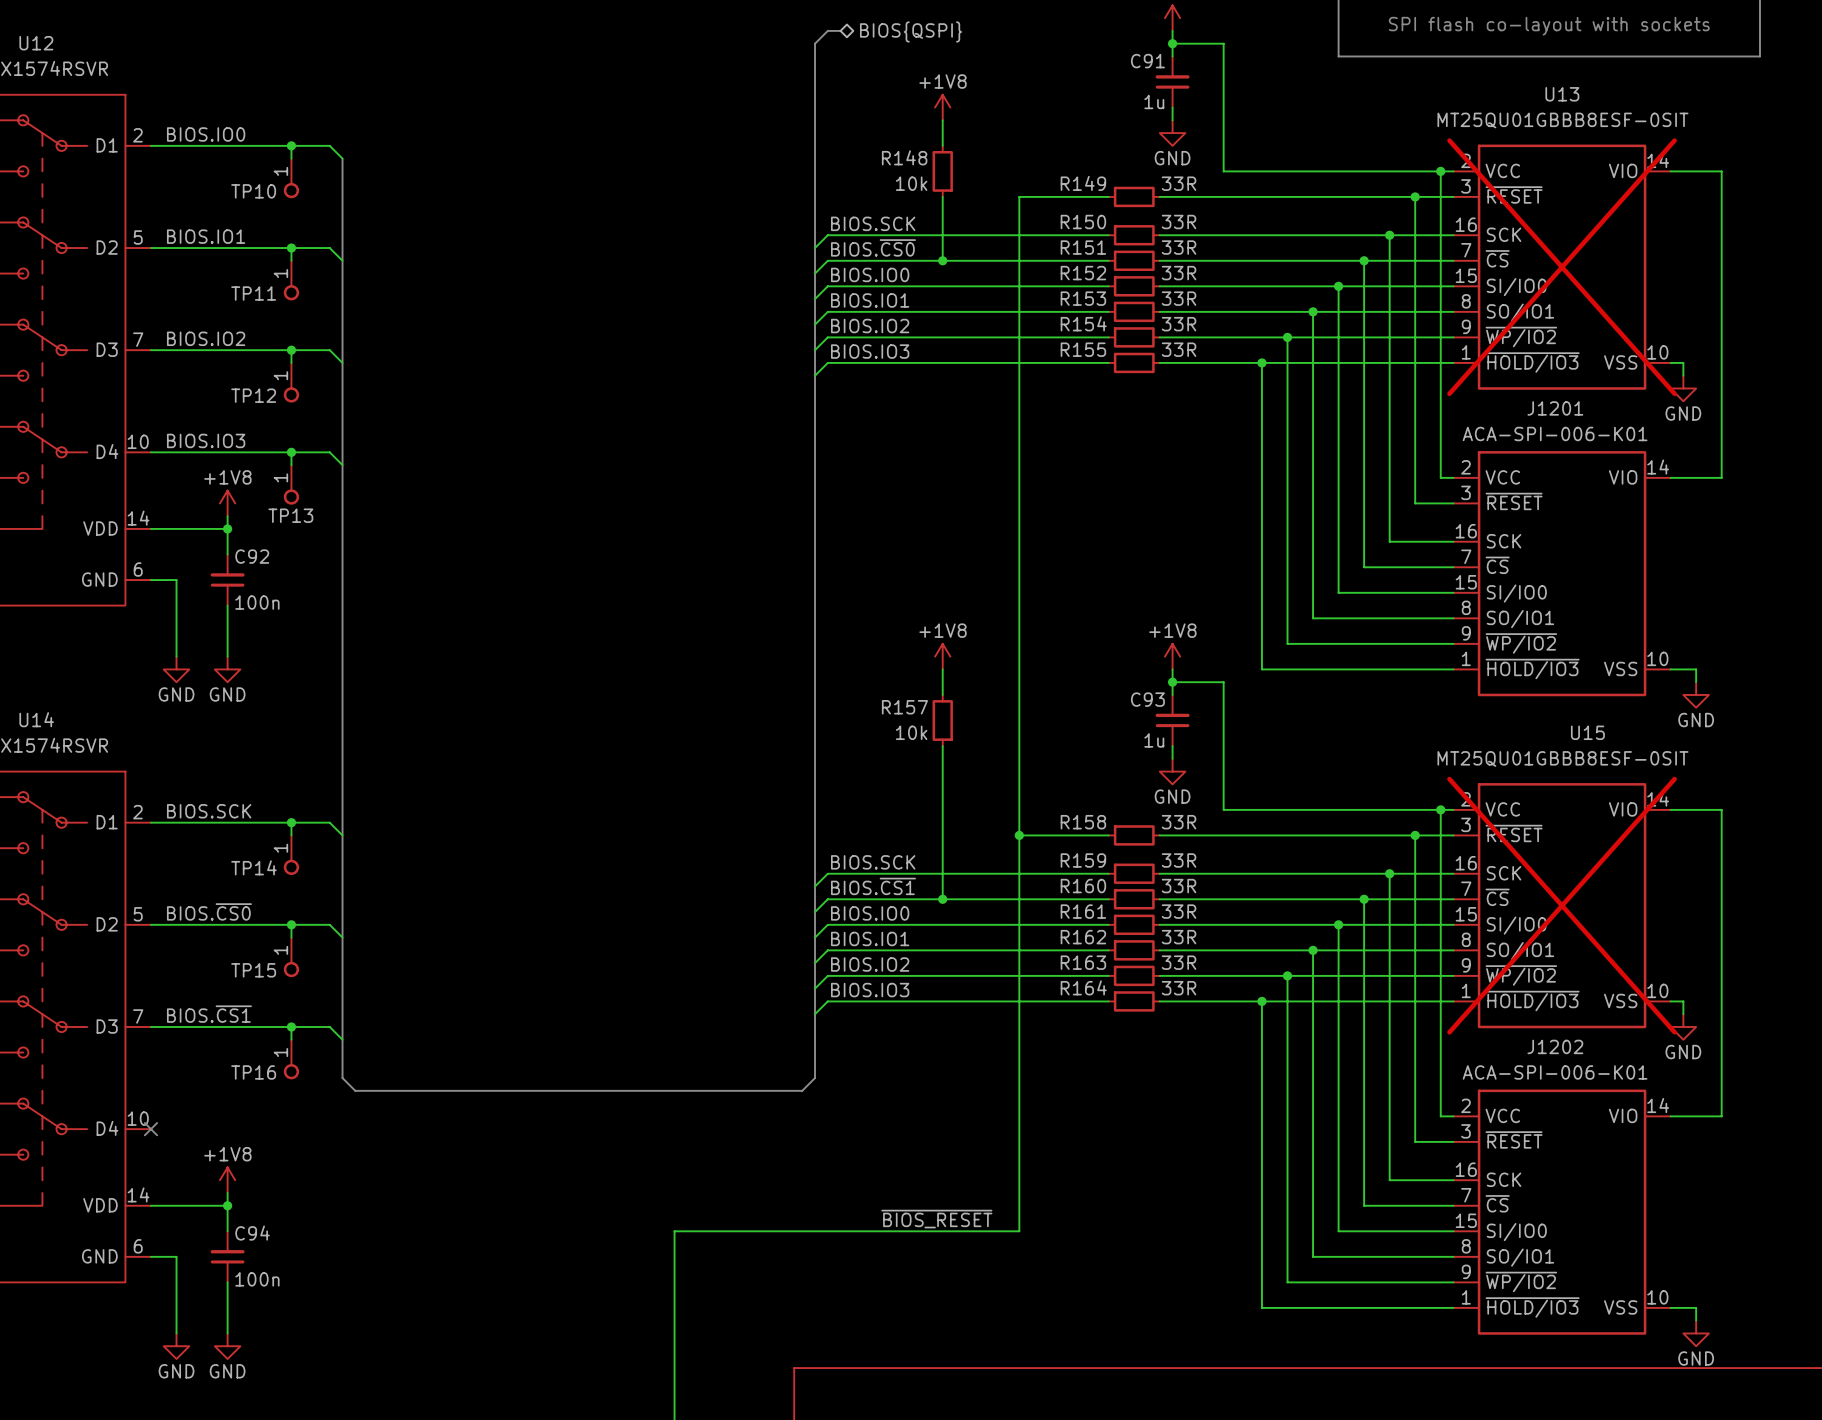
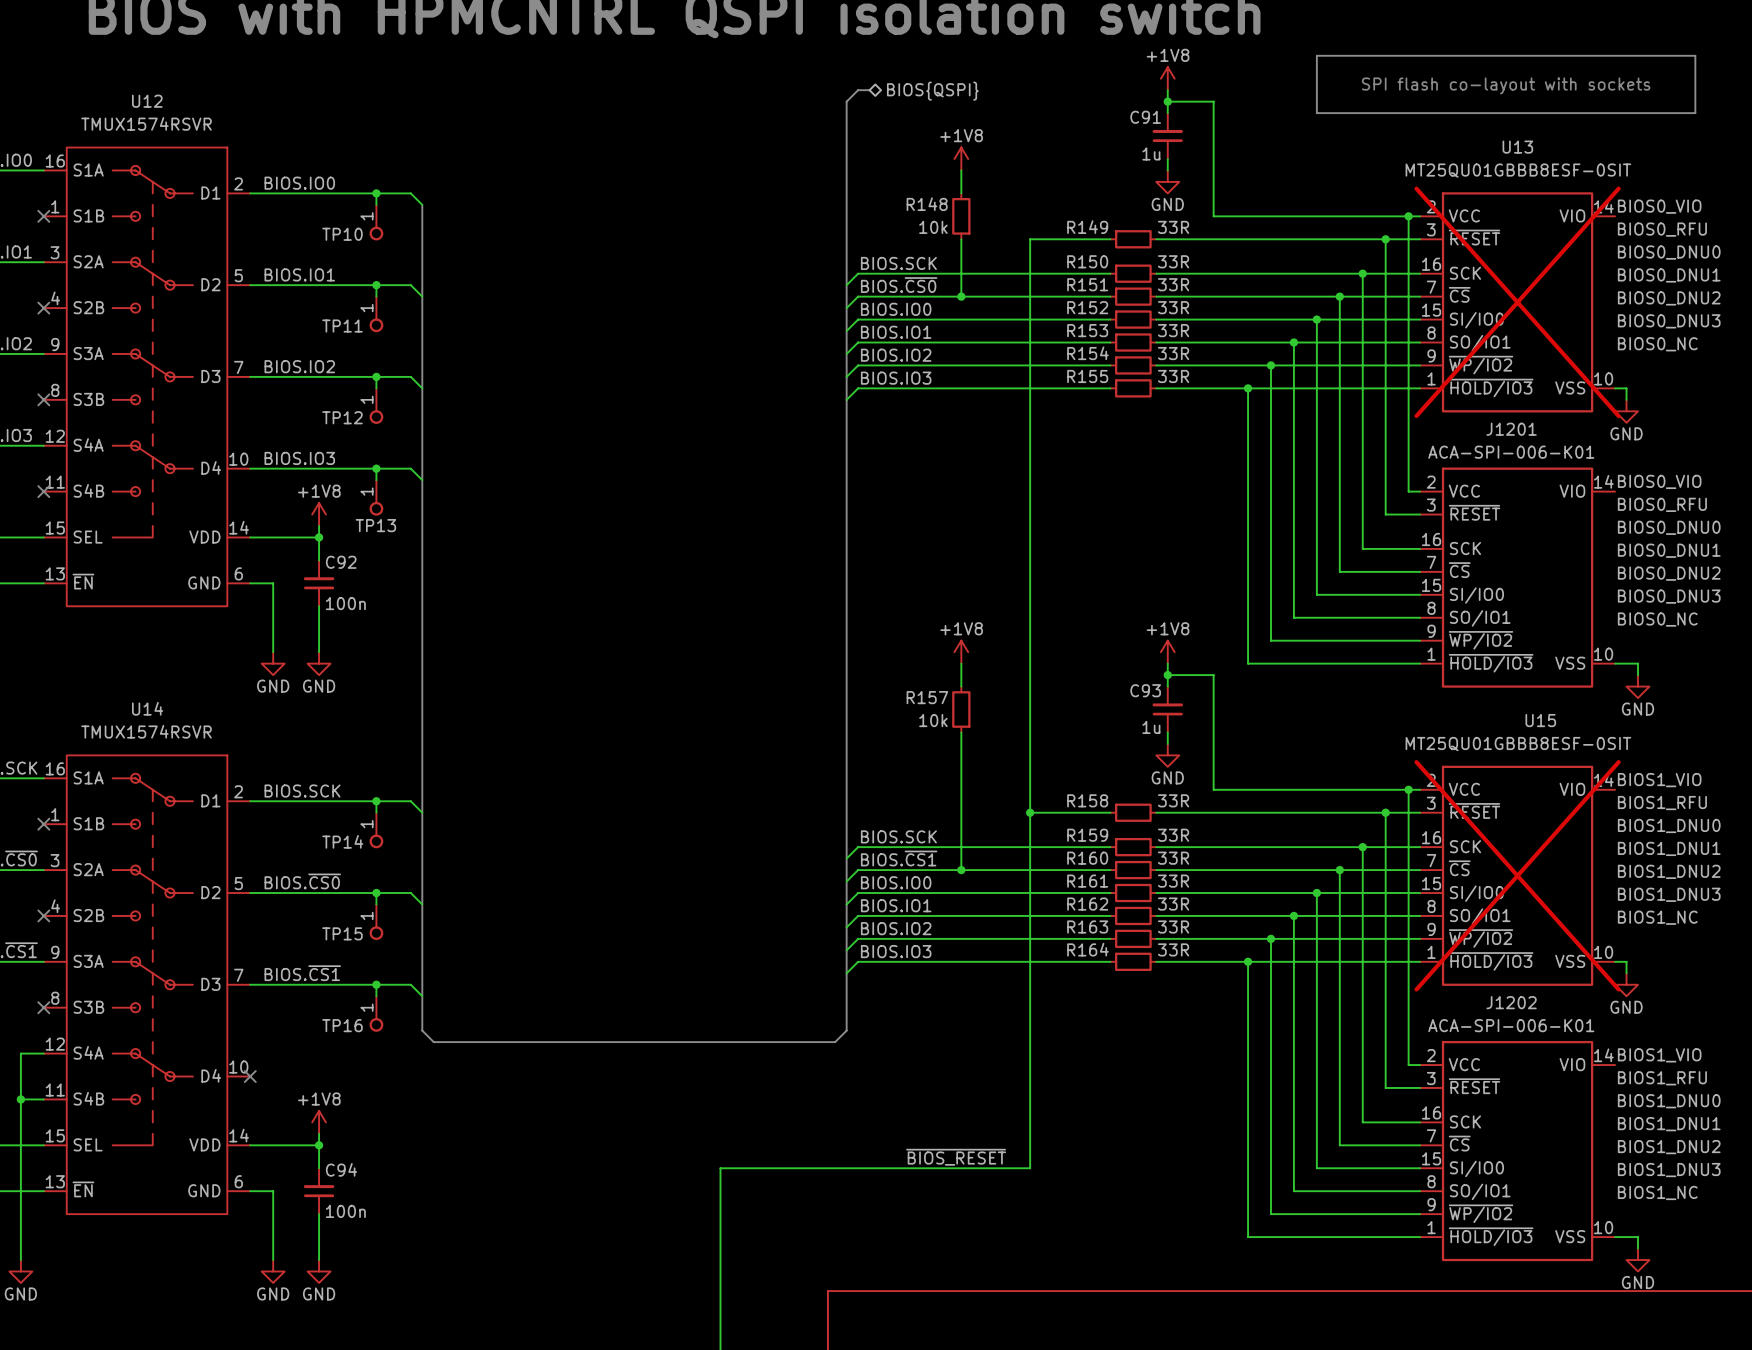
label: none -> BIOS0_VIO (1659, 206)
wire: (1670, 171) (1721, 171) (1721, 477) (1670, 477) -> none
label: none -> BIOS0_RFU (1662, 229)
label: none -> BIOS0_DNU0 (1669, 252)
label: none -> BIOS0_DNU1 (1669, 275)
label: none -> BIOS0_DNU2 (1669, 298)
label: none -> BIOS0_DNU3 (1669, 321)
label: none -> BIOS0_NC (1657, 344)
label: none -> BIOS0_VIO (1659, 481)
label: none -> BIOS0_RFU (1662, 504)
label: none -> BIOS0_DNU0 (1669, 527)
label: none -> BIOS0_DNU1 (1669, 550)
label: none -> BIOS0_DNU2 (1669, 573)
label: none -> BIOS0_DNU3 (1669, 596)
label: none -> BIOS0_NC (1657, 619)
label: none -> BIOS1_VIO (1659, 780)
wire: (1670, 809) (1721, 809) (1721, 1116) (1670, 1116) -> none
label: none -> BIOS1_RFU (1662, 803)
label: none -> BIOS1_DNU0 (1669, 825)
label: none -> BIOS1_DNU1 (1669, 848)
label: none -> BIOS1_DNU2 (1669, 871)
label: none -> BIOS1_DNU3 (1669, 894)
label: none -> BIOS1_NC (1657, 917)
label: none -> BIOS1_VIO (1659, 1055)
label: none -> BIOS1_RFU (1662, 1078)
label: none -> BIOS1_DNU0 (1669, 1101)
label: none -> BIOS1_DNU1 (1669, 1124)
label: none -> BIOS1_DNU2 (1669, 1147)
label: none -> BIOS1_DNU3 (1669, 1170)
label: none -> BIOS1_NC (1657, 1192)

